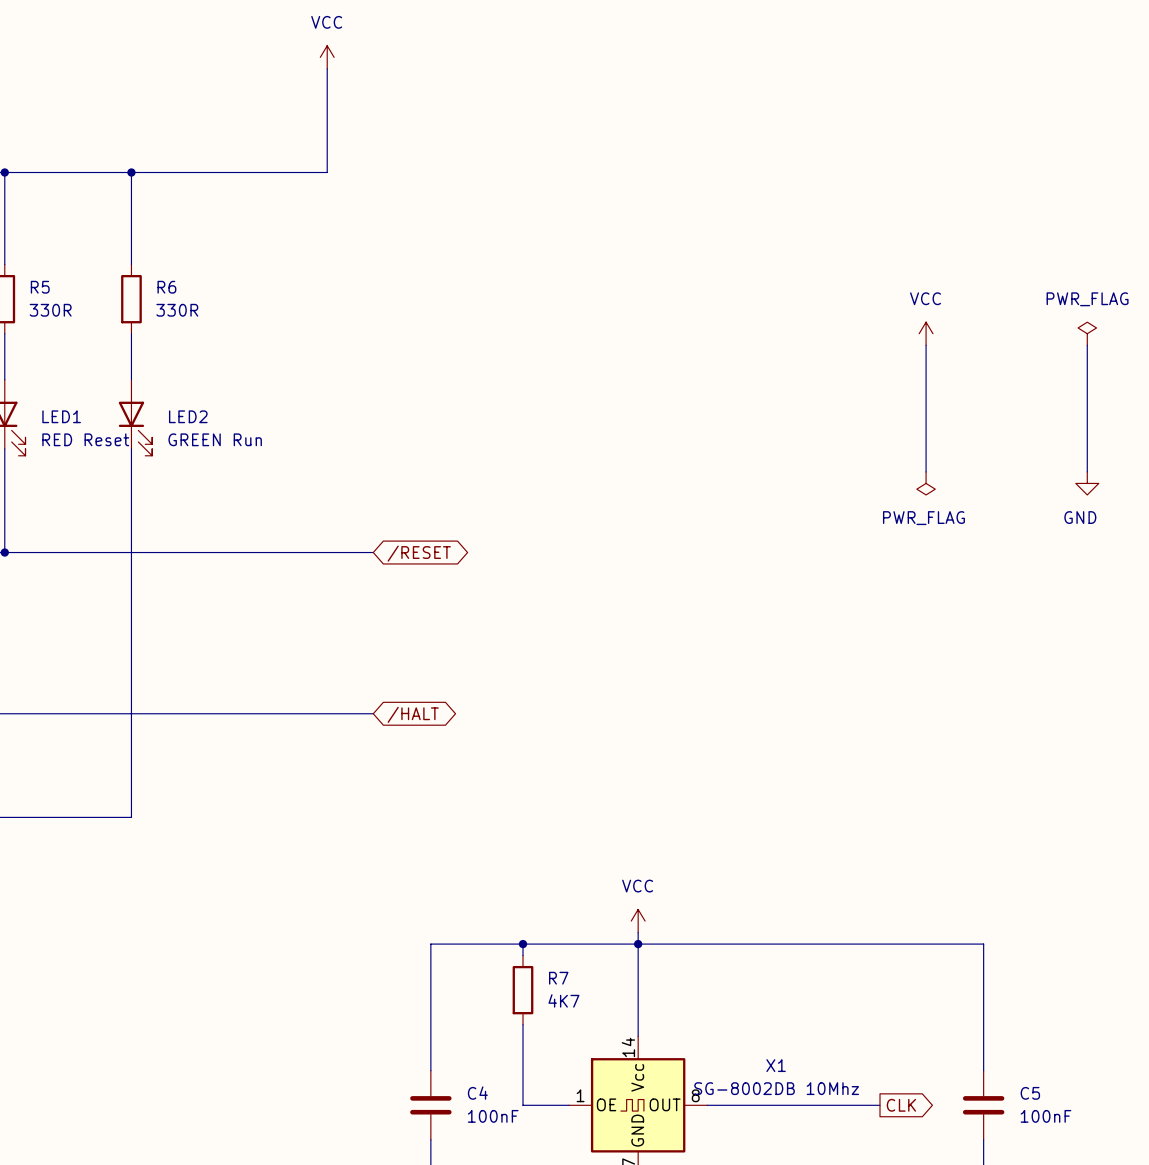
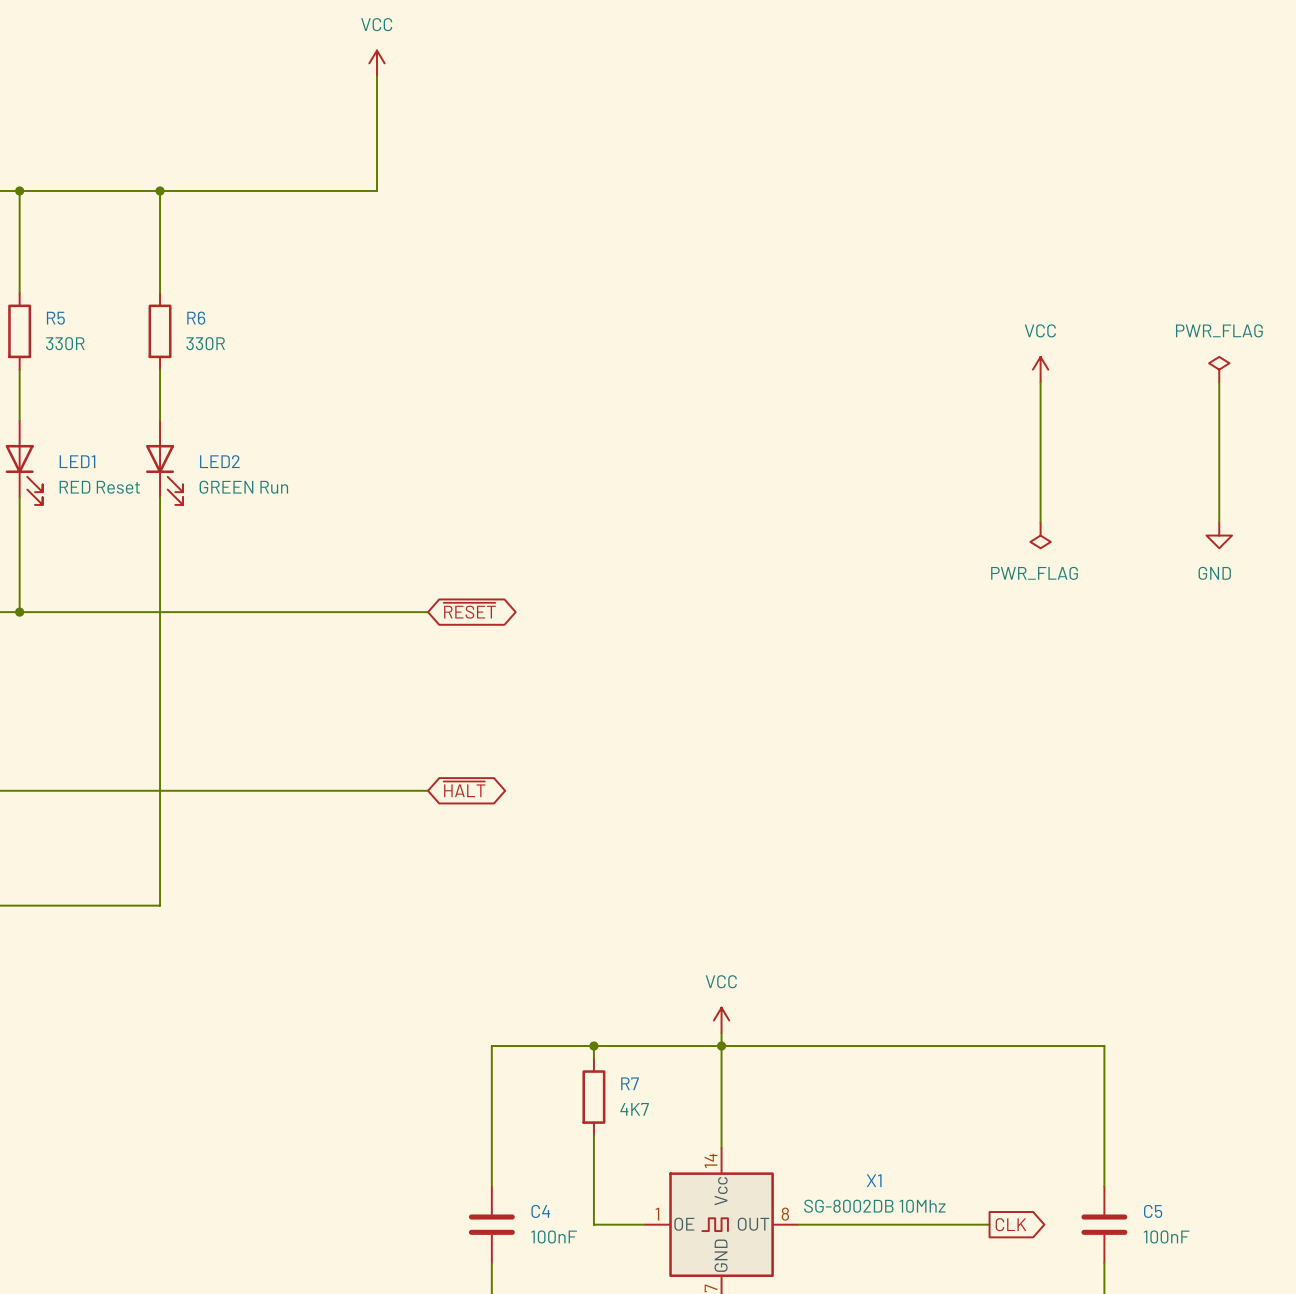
global label: /RESET (419, 553) -> ~{RESET} (469, 610)
global label: /HALT (413, 714) -> ~{HALT} (464, 789)

